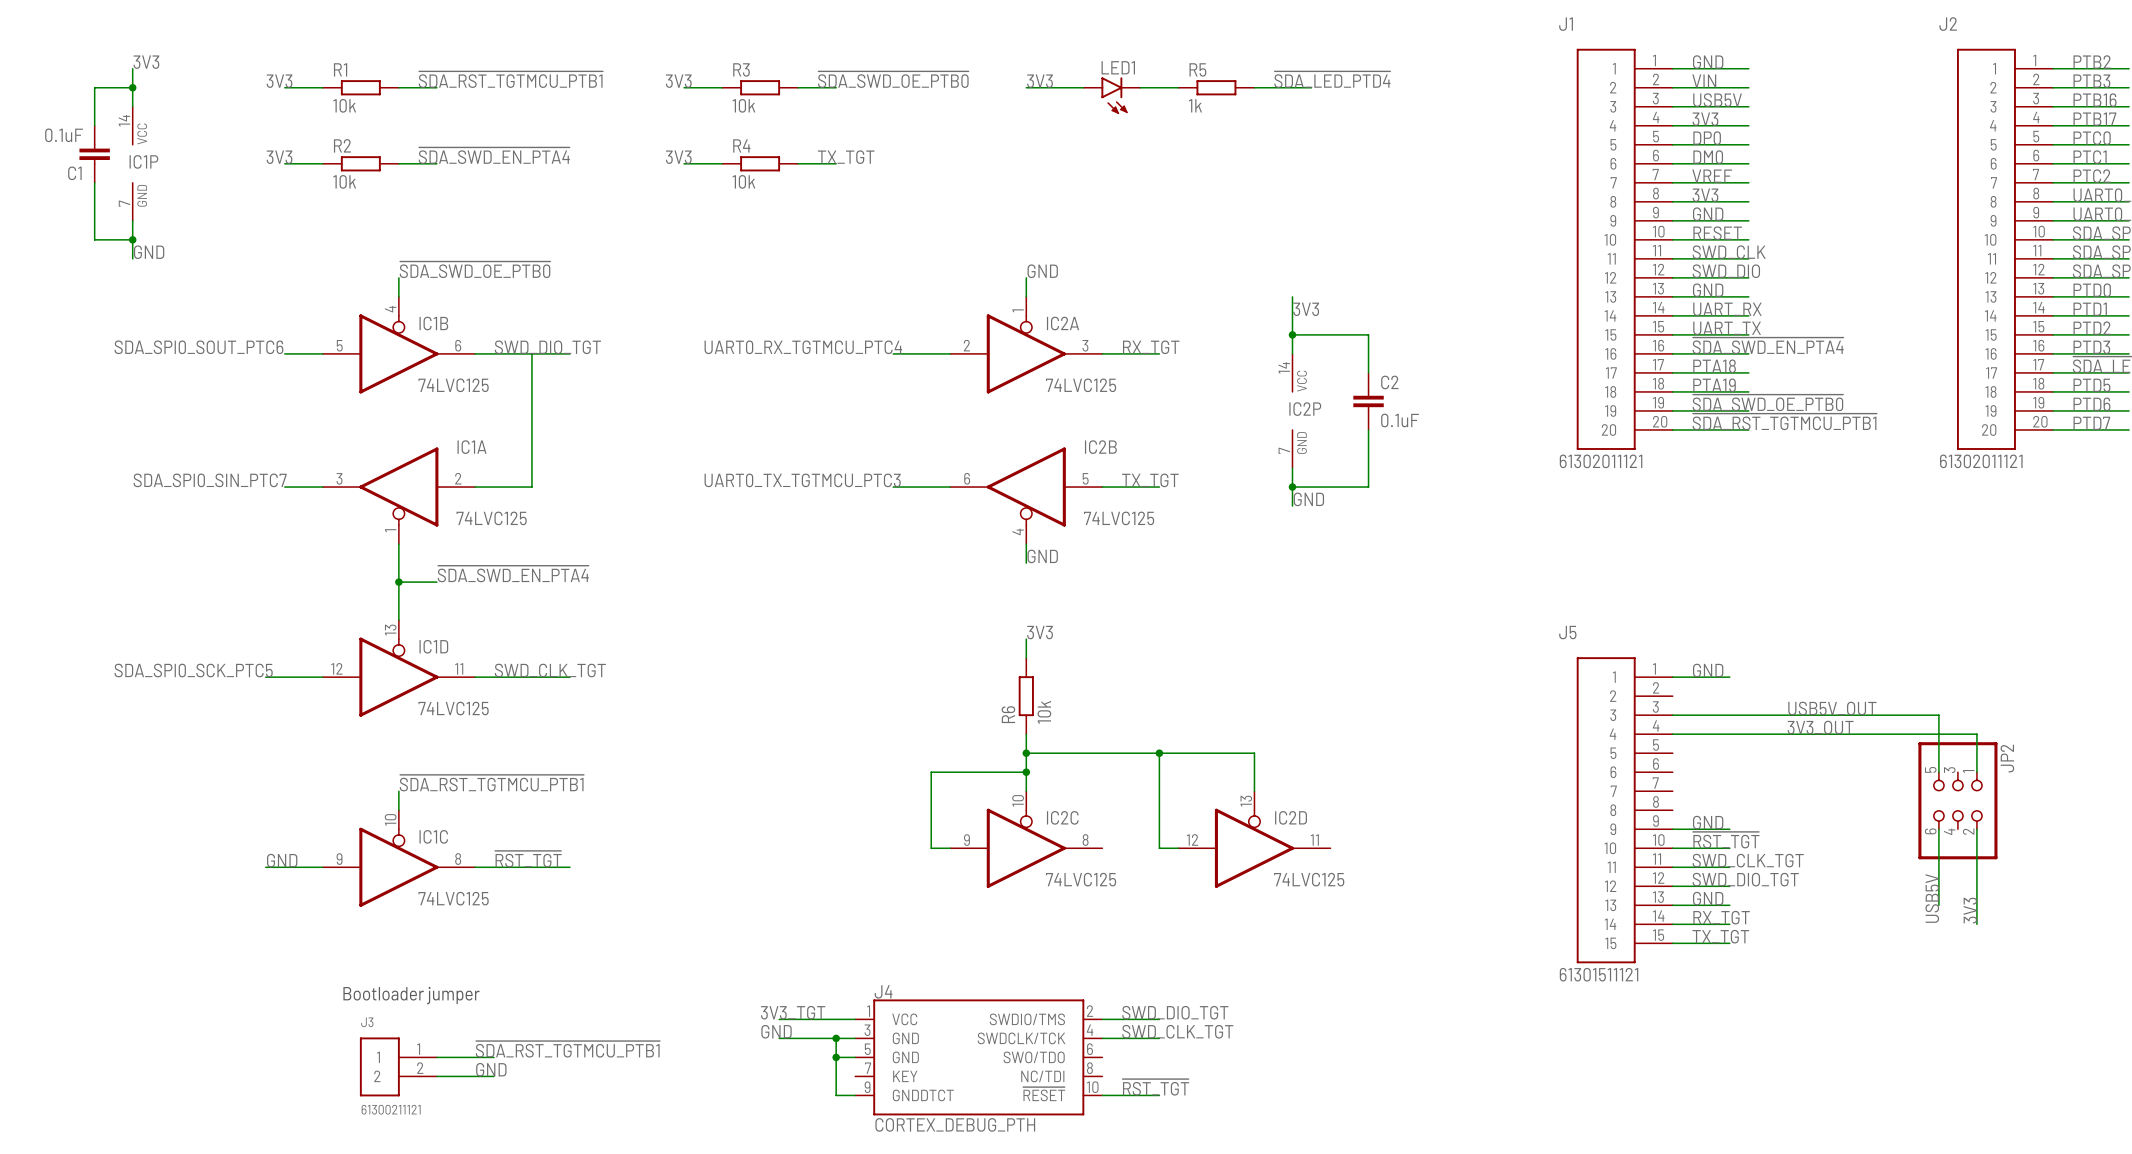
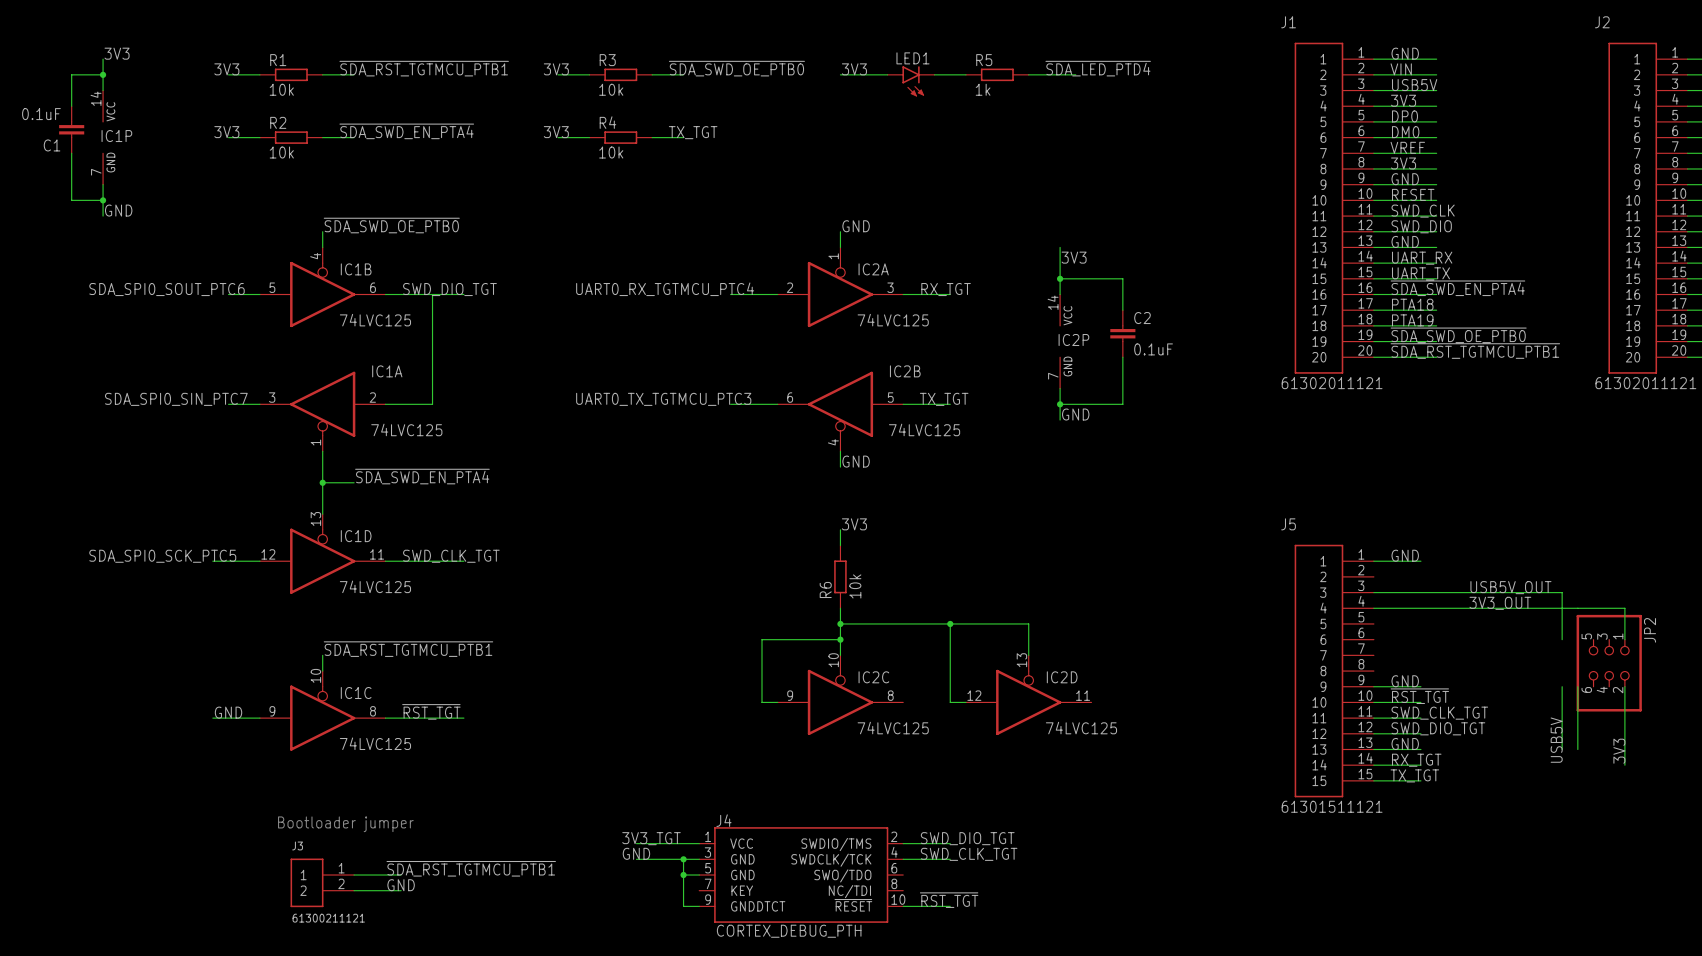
wire: (1900, 715) (1938, 715) (1938, 772) -> (1562, 592) (1562, 639)
wire: none -> (1562, 686) (1562, 749)
wire: (1938, 829) (1938, 905) -> (1577, 686) (1577, 749)
label position: USB5V (1932, 898) -> USB5V (1556, 740)

